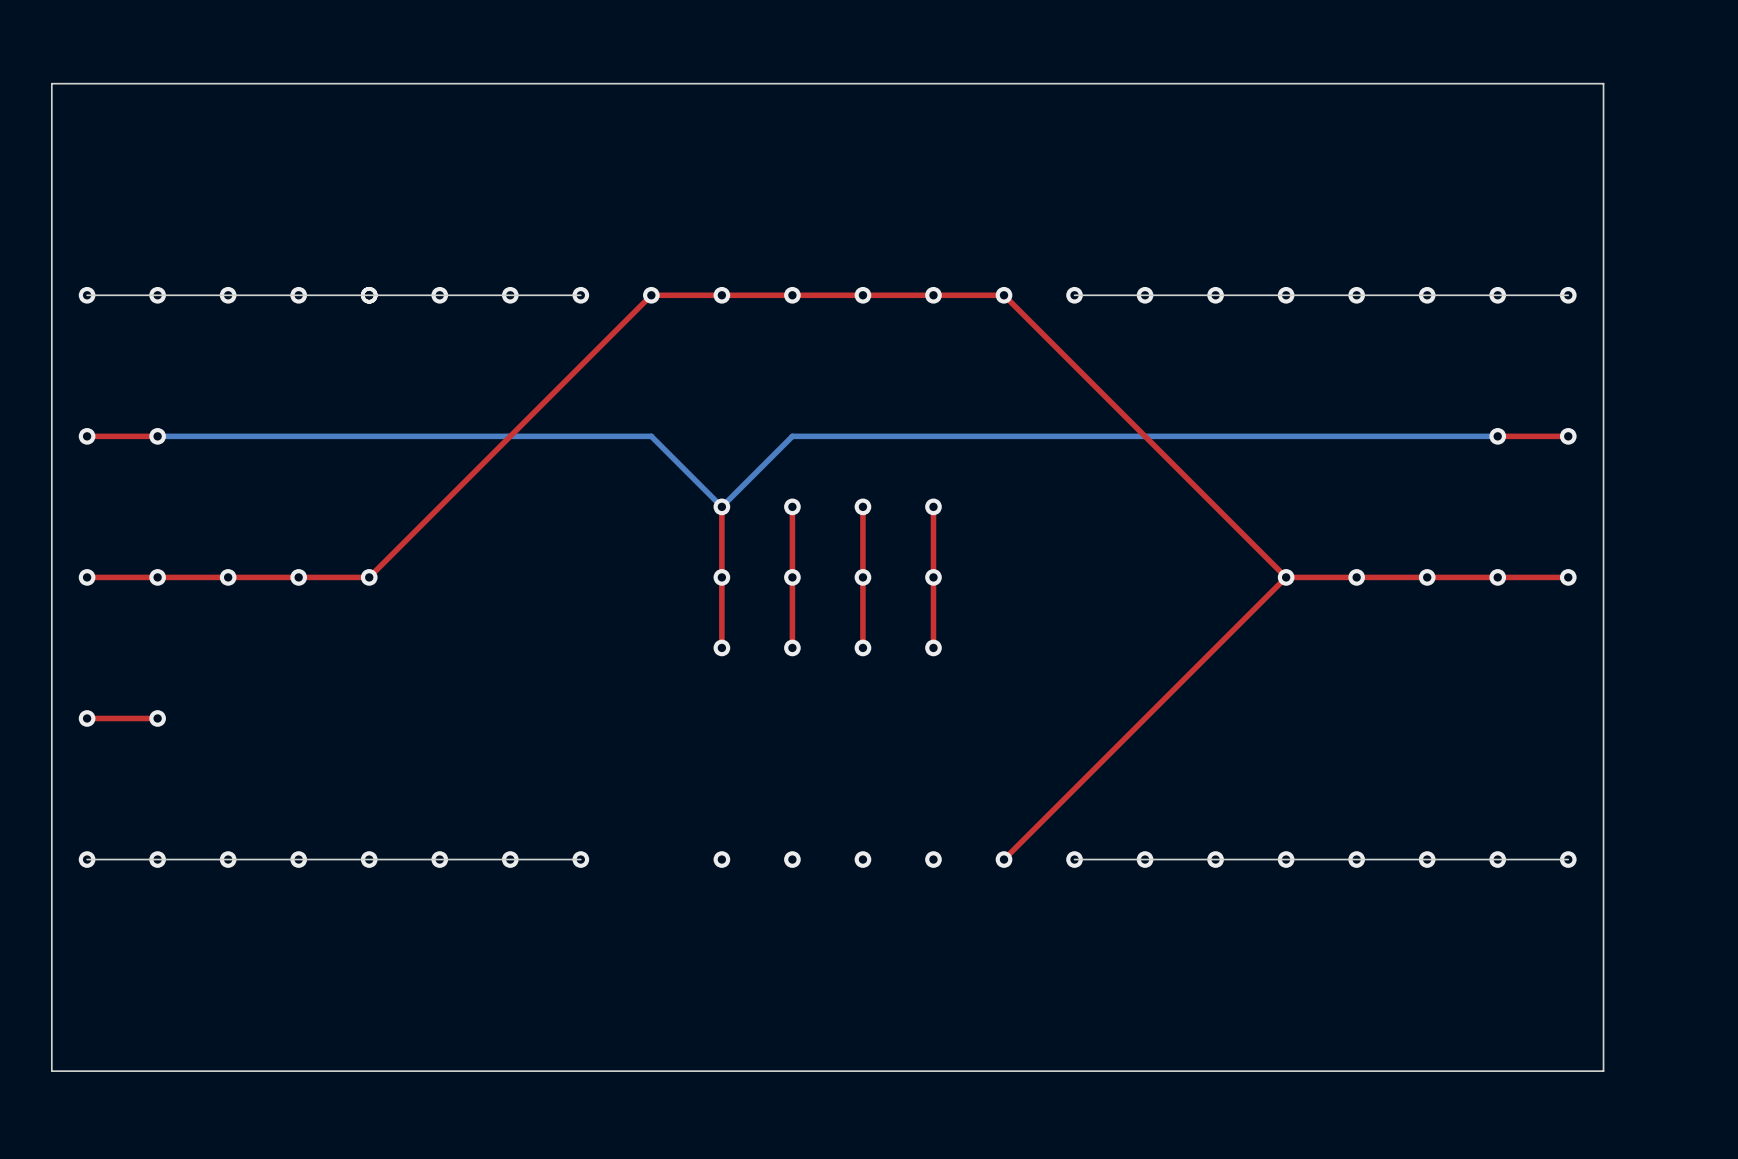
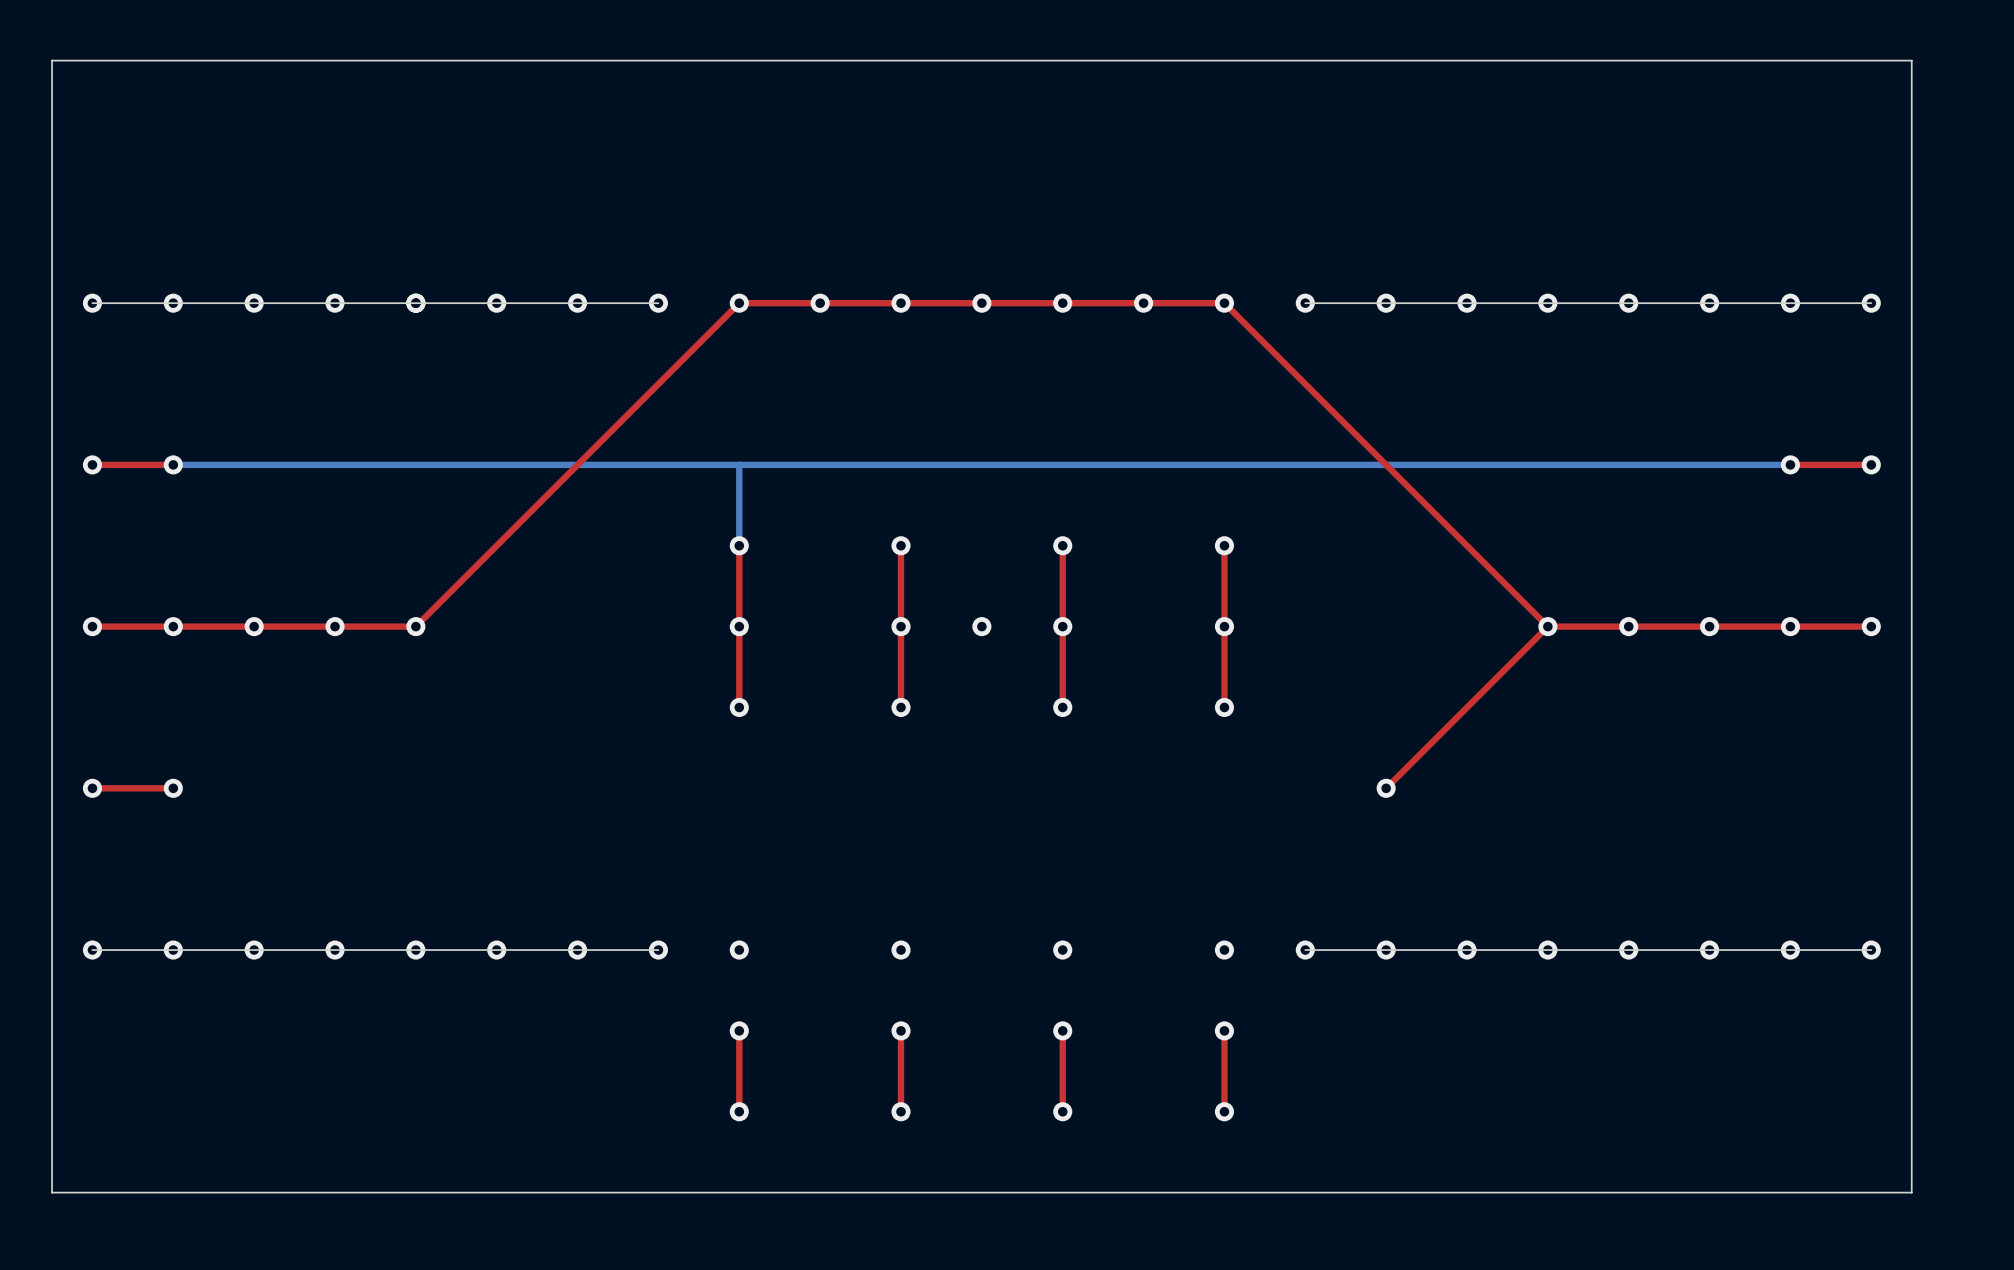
board edge: (1603, 83) (1603, 1071) -> (1830, 60) (1911, 60) (1911, 1192) (1830, 1192)
top track: (1004, 295) (1286, 577) -> (1143, 303) (1224, 303) (1547, 626) (1386, 788)
board edge: (1074, 295) (1145, 295) -> (1790, 303) (1871, 303)
via: none -> (1871, 303)
bottom track: (651, 436) (721, 506) (792, 436) -> (739, 545) (739, 464) (901, 464)
top track: (1497, 436) (1568, 436) -> (1871, 464) (1790, 464)
bottom track: none -> (1709, 464) (1790, 464)
via: (1497, 436) -> none
via: none -> (1871, 464)
via: none -> (739, 545)
top track: (721, 506) (721, 647) -> (739, 545) (739, 707)
via: (721, 506) -> none
top track: (862, 506) (862, 647) -> (1224, 545) (1224, 707)
via: (862, 506) -> none
via: none -> (1224, 545)
via: none -> (739, 626)
via: (721, 577) -> none
via: none -> (1224, 626)
top track: (1286, 577) (1356, 577) -> (1790, 626) (1871, 626)
top track: (1286, 577) (1004, 859) -> none
via: (1286, 577) -> none
via: none -> (1871, 626)
via: none -> (739, 707)
via: (721, 647) -> none
via: (862, 647) -> none
via: none -> (1224, 707)
via: none -> (1386, 788)
via: none -> (739, 950)
via: (721, 859) -> none
via: (862, 859) -> none
via: (1004, 859) -> none
board edge: (1074, 859) (1145, 859) -> (1790, 950) (1871, 950)
via: none -> (1871, 950)
top track: none -> (739, 1030) (739, 1111)
via: none -> (739, 1030)
top track: none -> (901, 1030) (901, 1111)
via: none -> (901, 1030)
top track: none -> (1062, 1030) (1062, 1111)
via: none -> (1062, 1030)
top track: none -> (1224, 1030) (1224, 1111)
via: none -> (1224, 1030)
via: none -> (739, 1111)
via: none -> (901, 1111)
via: none -> (1062, 1111)
via: none -> (1224, 1111)

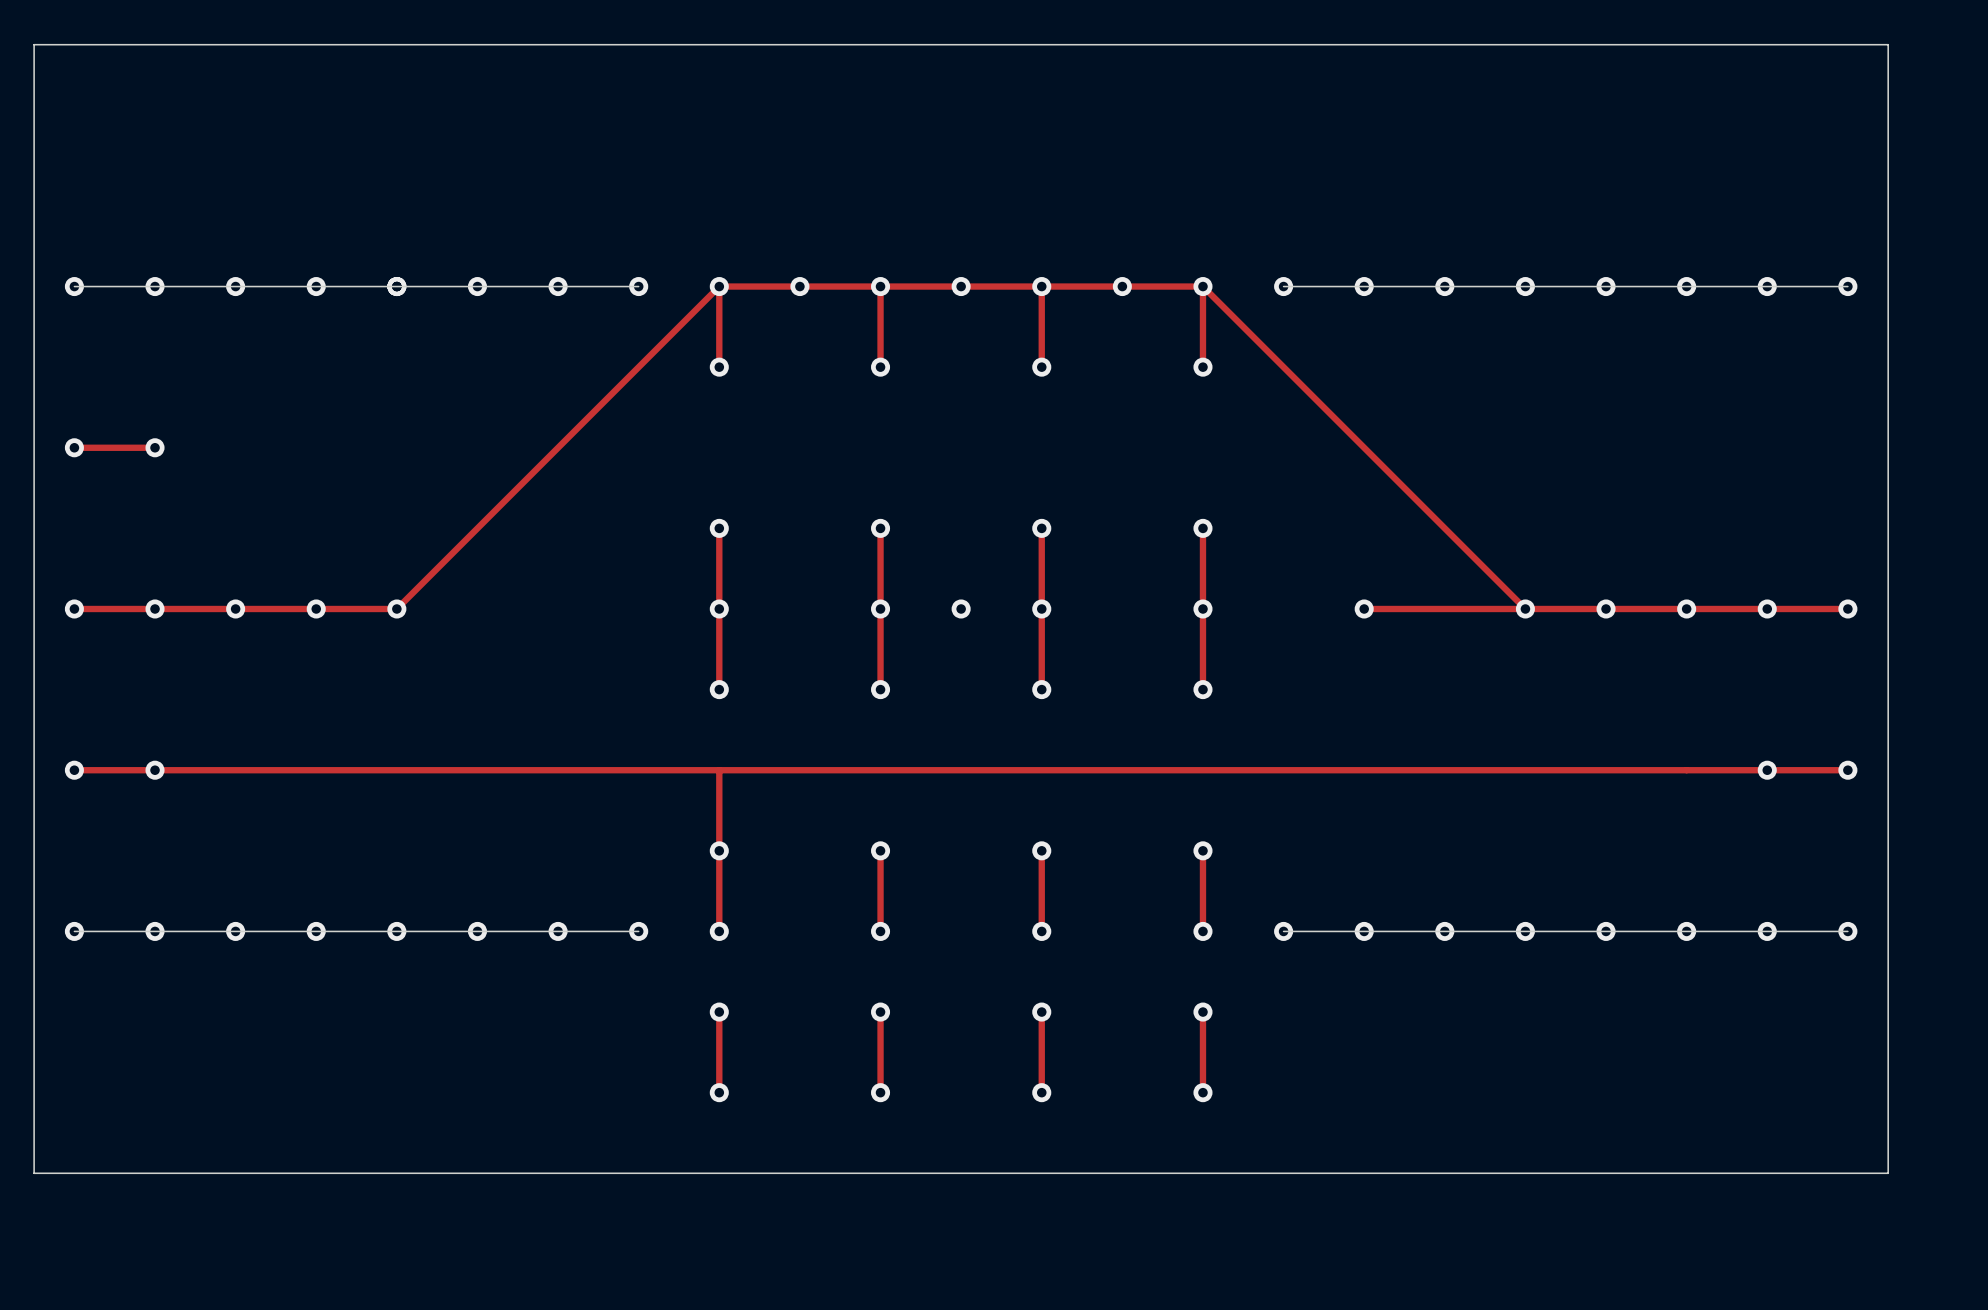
top track: none -> (719, 286) (719, 367)
top track: none -> (880, 286) (880, 367)
top track: none -> (1041, 286) (1041, 367)
top track: none -> (1202, 286) (1202, 367)
via: none -> (719, 367)
via: none -> (880, 367)
via: none -> (1041, 367)
via: none -> (1202, 367)
bottom track: (173, 464) (1790, 464) -> none
bottom track: (739, 464) (739, 545) -> none
top track: (1790, 464) (1871, 464) -> none
via: (1790, 464) -> none
via: (1871, 464) -> none
via: none -> (1364, 608)
top track: (1547, 626) (1386, 788) -> (1525, 608) (1364, 608)
top track: none -> (155, 770) (1847, 770)
top track: none -> (719, 770) (719, 931)
via: (1386, 788) -> none
via: none -> (1767, 770)
via: none -> (1847, 770)
via: none -> (719, 850)
top track: none -> (880, 850) (880, 931)
via: none -> (880, 850)
top track: none -> (1041, 850) (1041, 931)
via: none -> (1041, 850)
top track: none -> (1202, 850) (1202, 931)
via: none -> (1202, 850)

